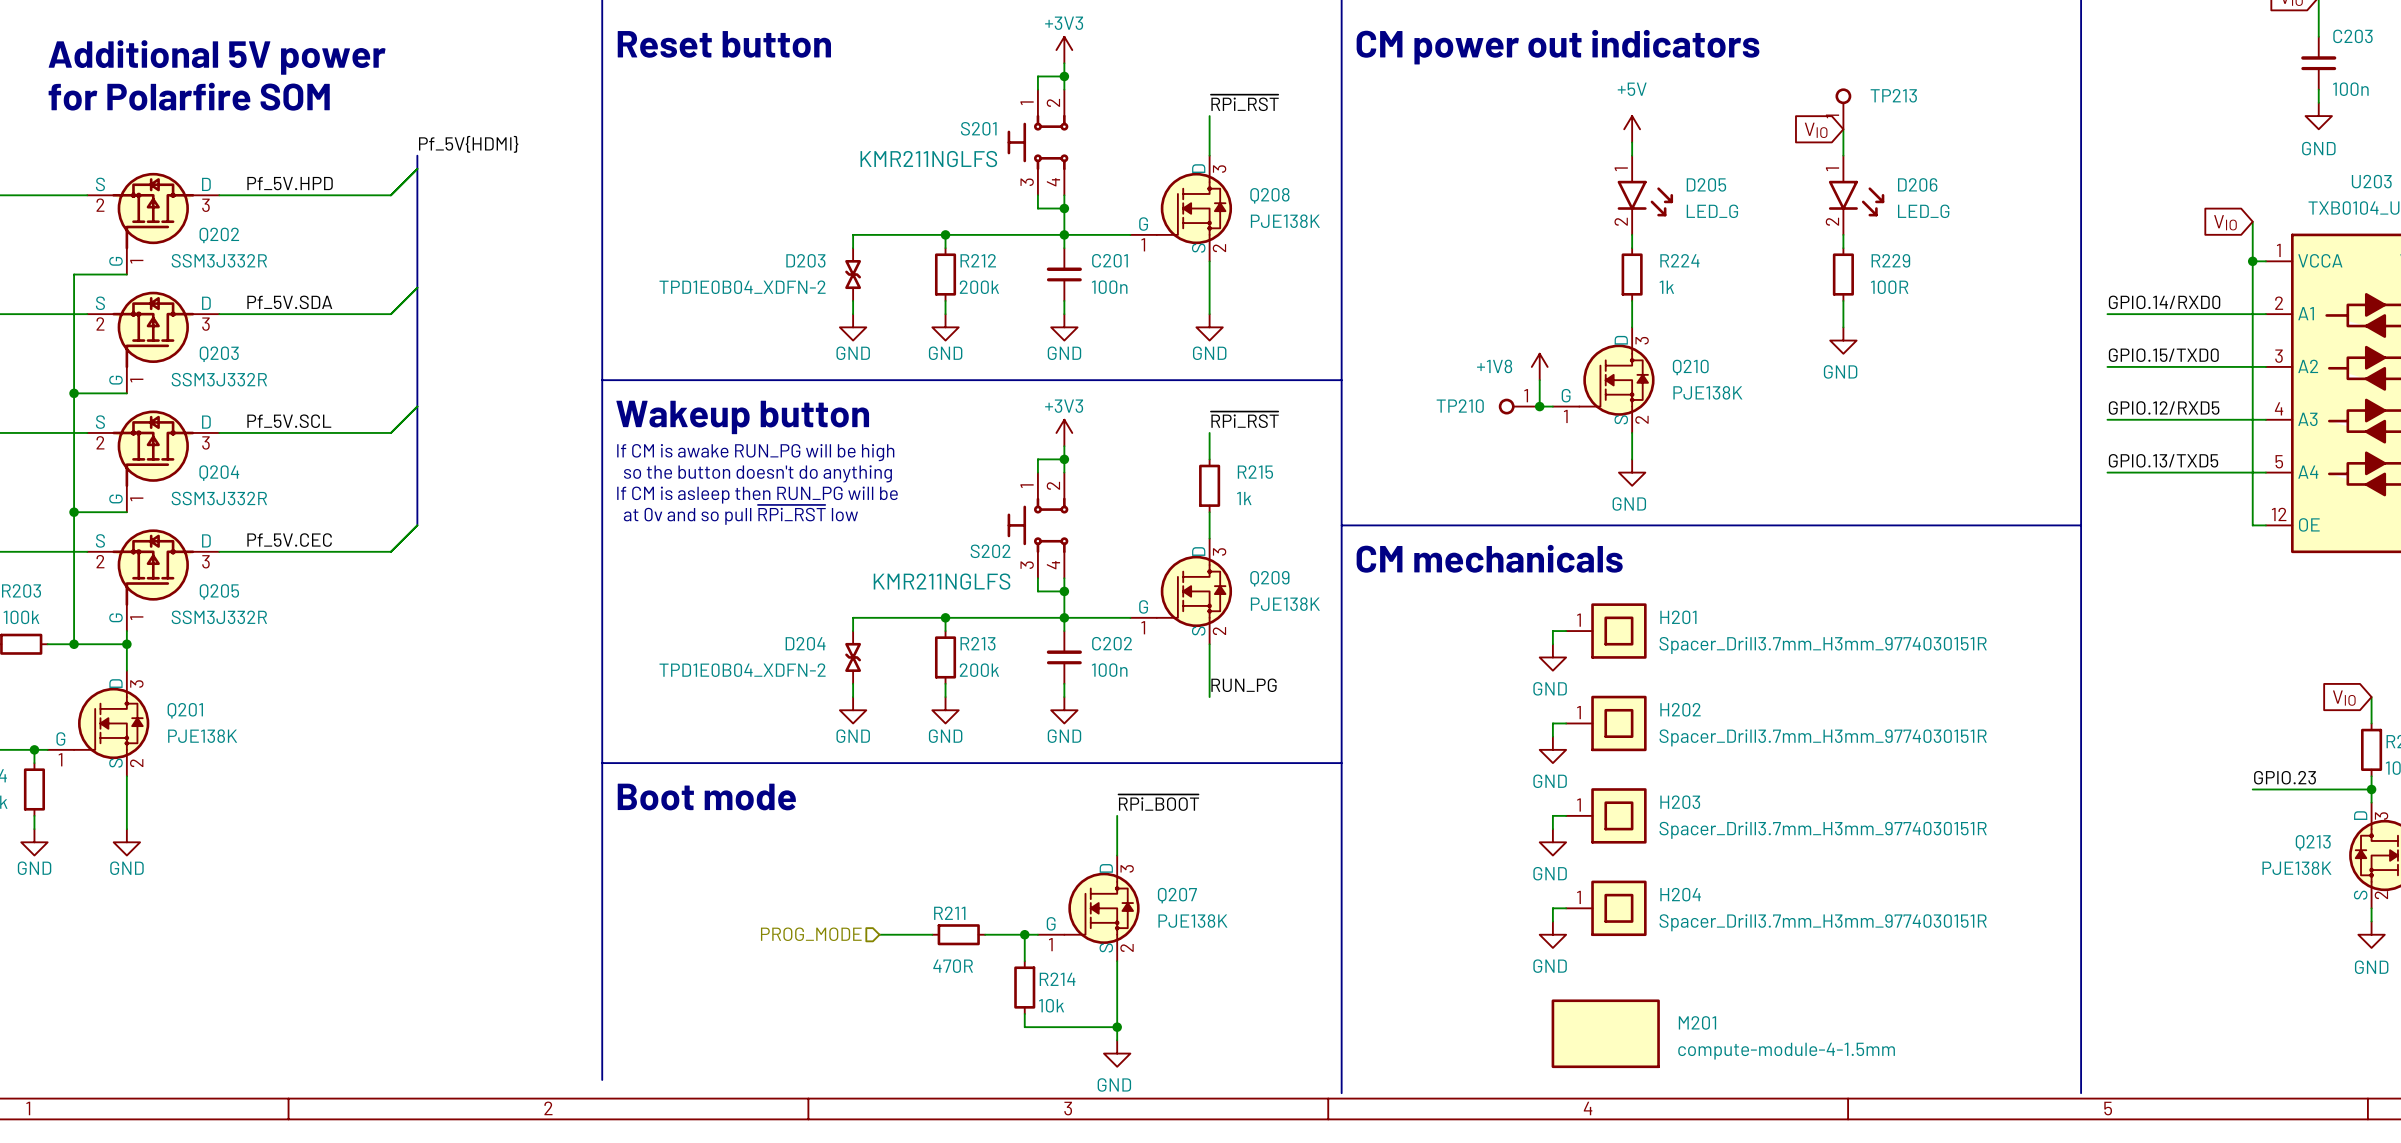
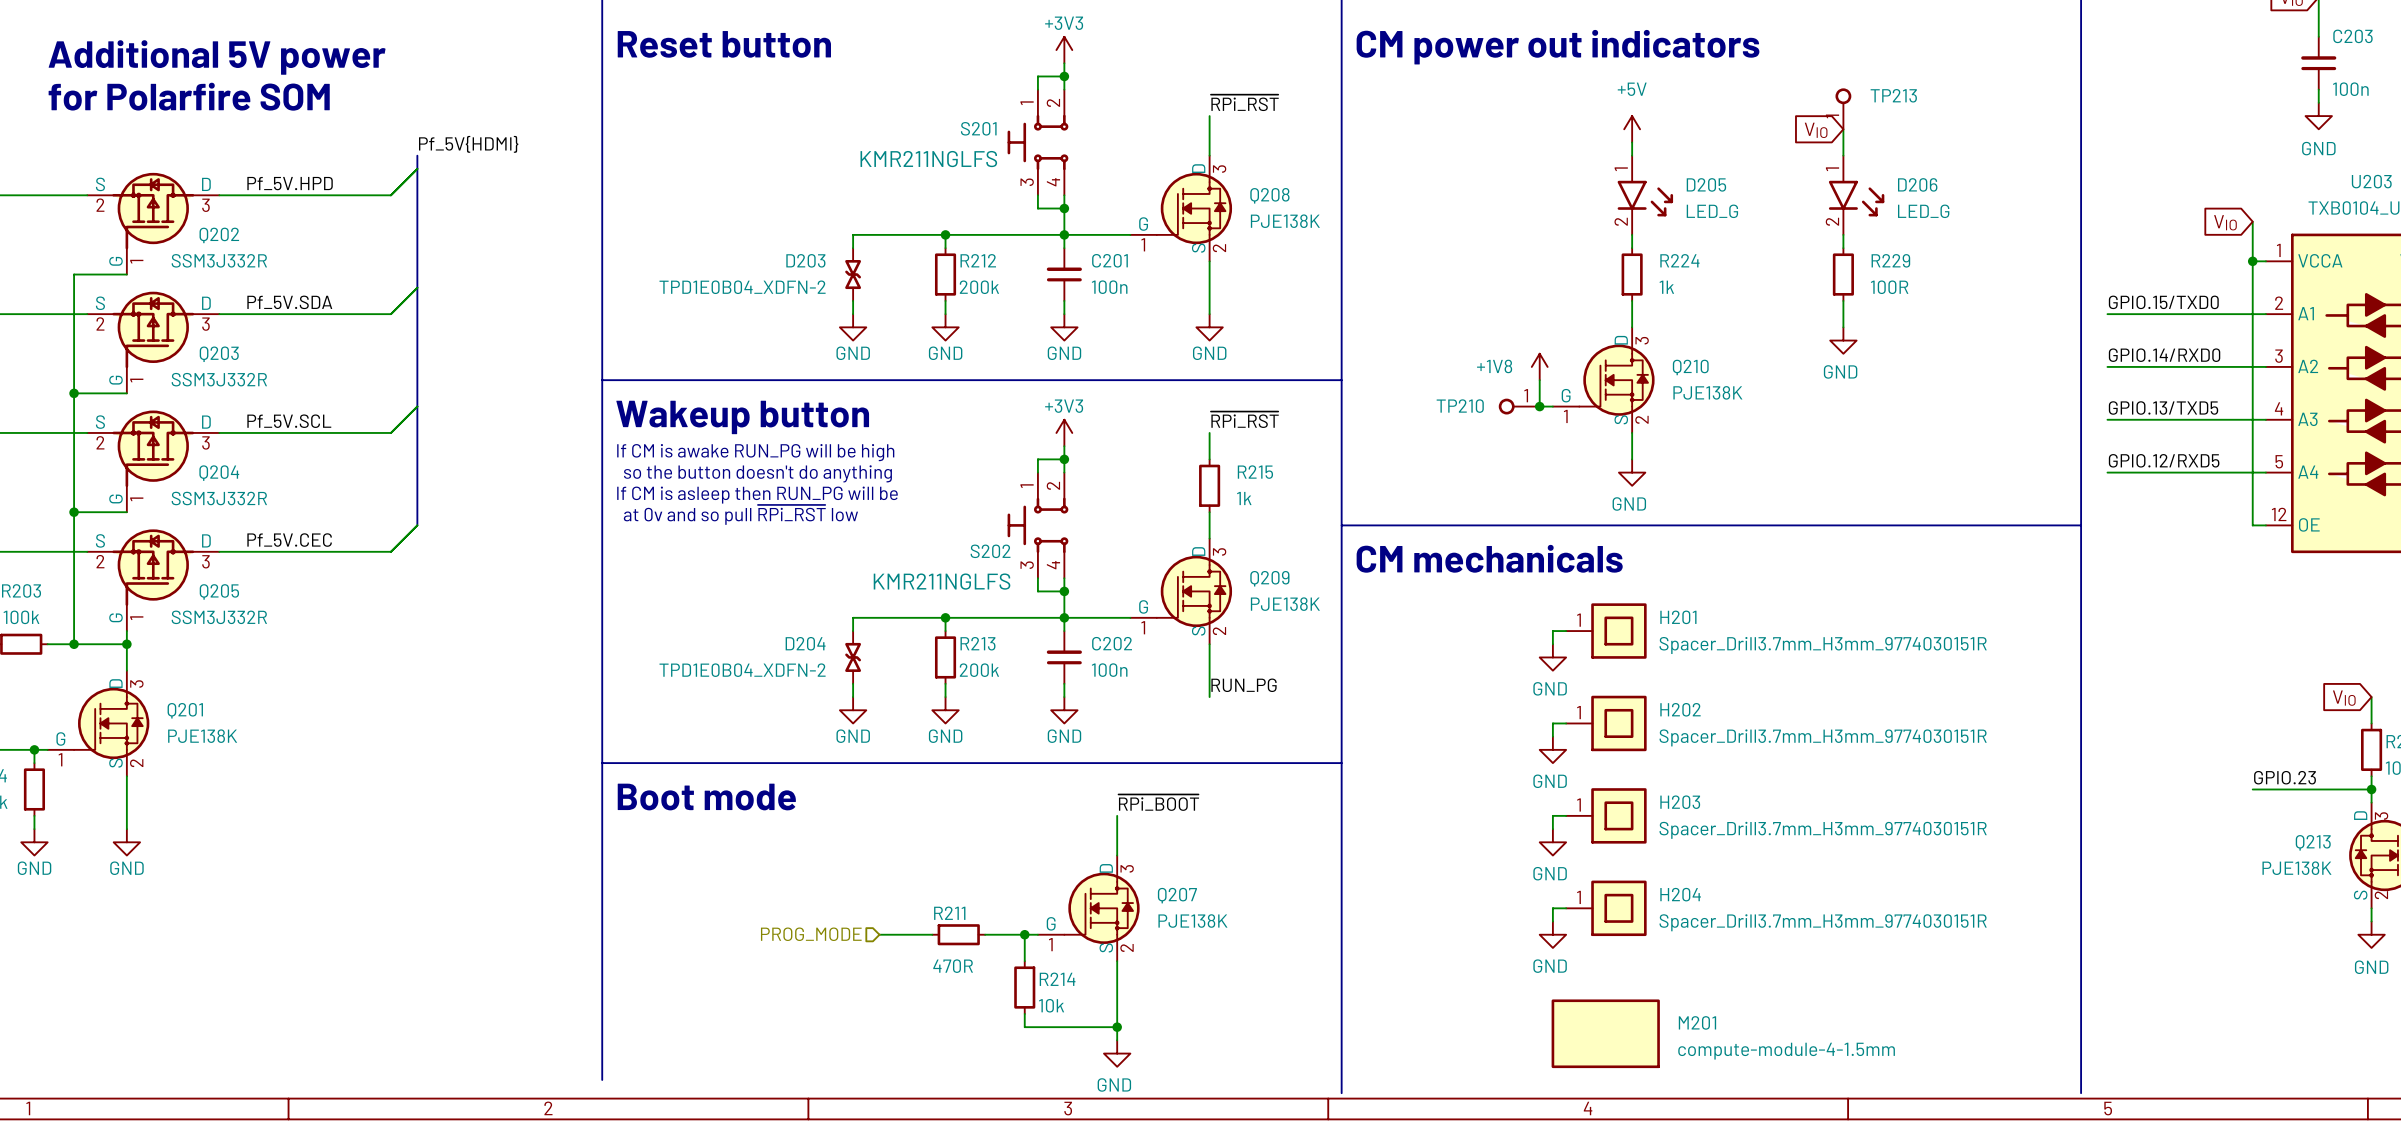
label: GPIO.14/RXD0 (2164, 302) -> GPIO.15/TXD0 (2163, 302)
label: GPIO.15/TXD0 (2163, 355) -> GPIO.14/RXD0 (2164, 355)
label: GPIO.12/RXD5 (2164, 407) -> GPIO.13/TXD5 (2163, 407)
label: GPIO.13/TXD5 (2163, 460) -> GPIO.12/RXD5 (2164, 460)

